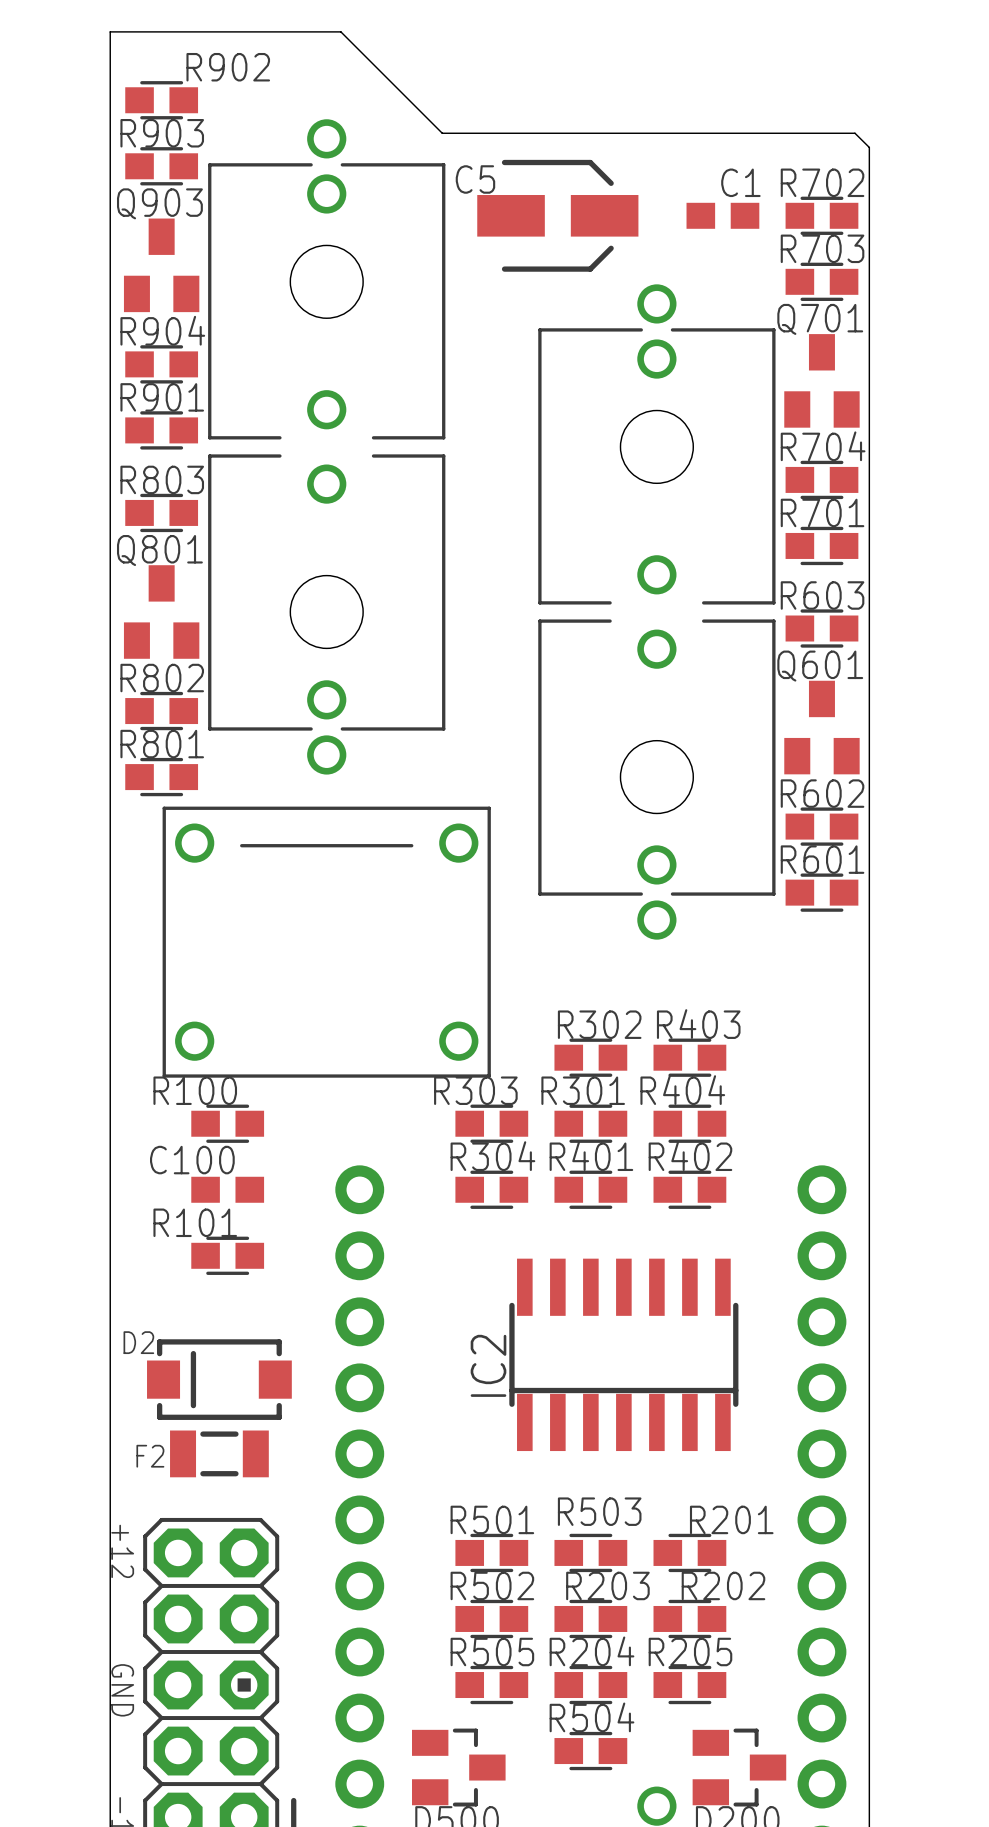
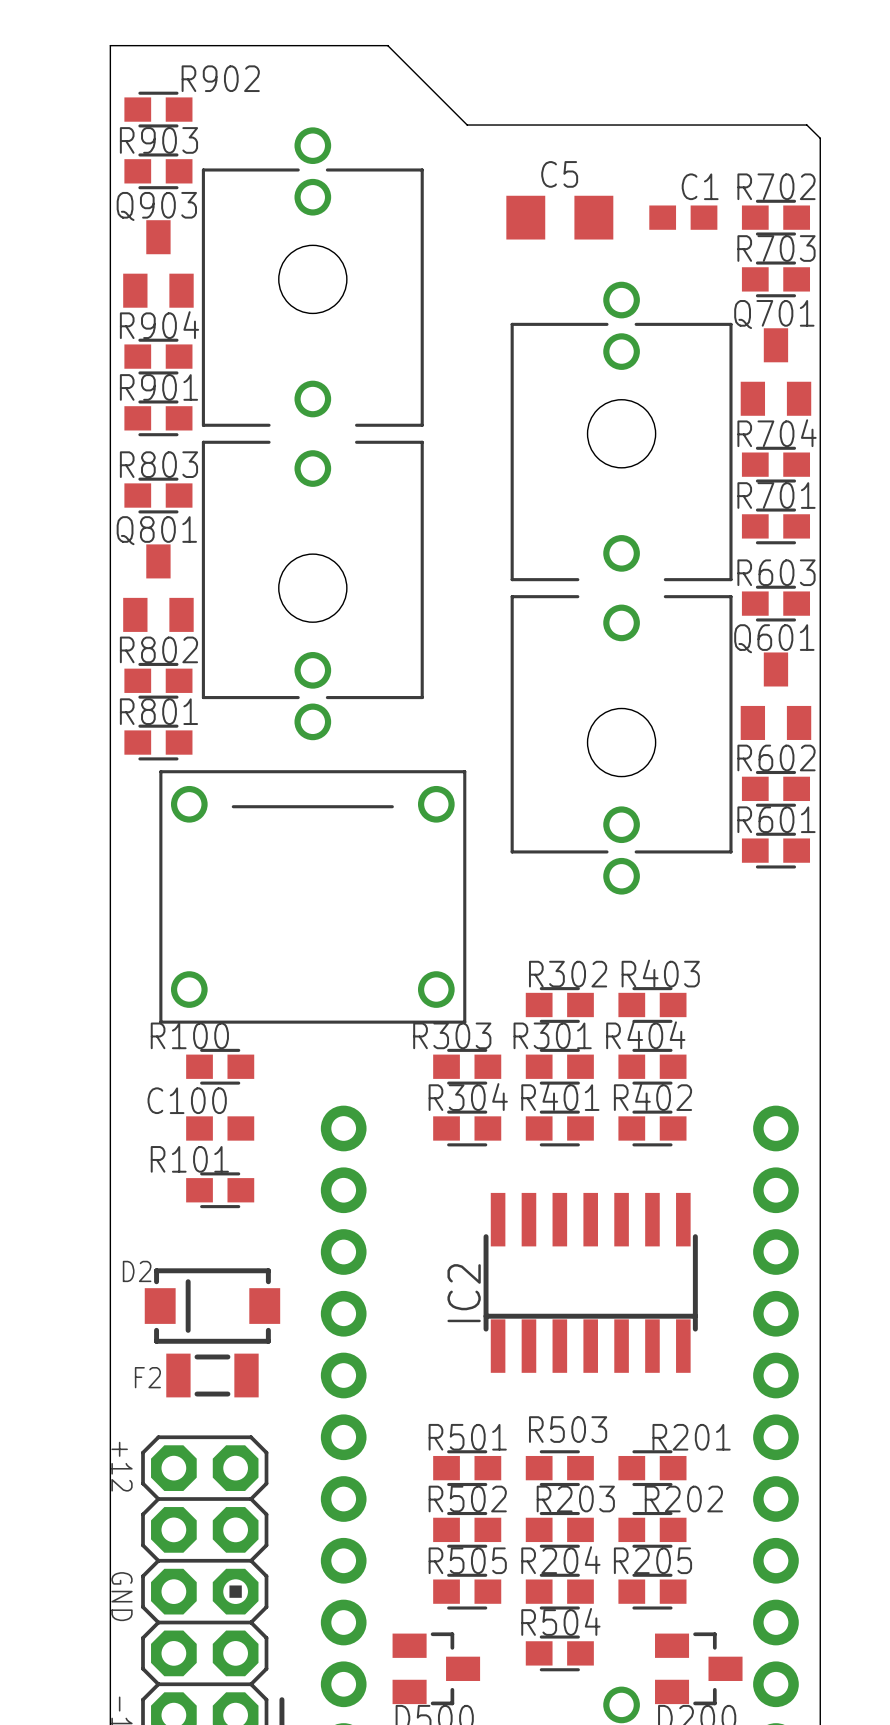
board edge: (340, 31) (442, 133) (854, 133) (869, 147) -> (326, 45) (387, 45) (467, 125) (806, 125) (820, 138) (820, 153)
C5 footprint: [477, 159, 639, 272] -> [506, 195, 614, 240]
C5 name position: C5 (475, 179) -> C5 (559, 174)

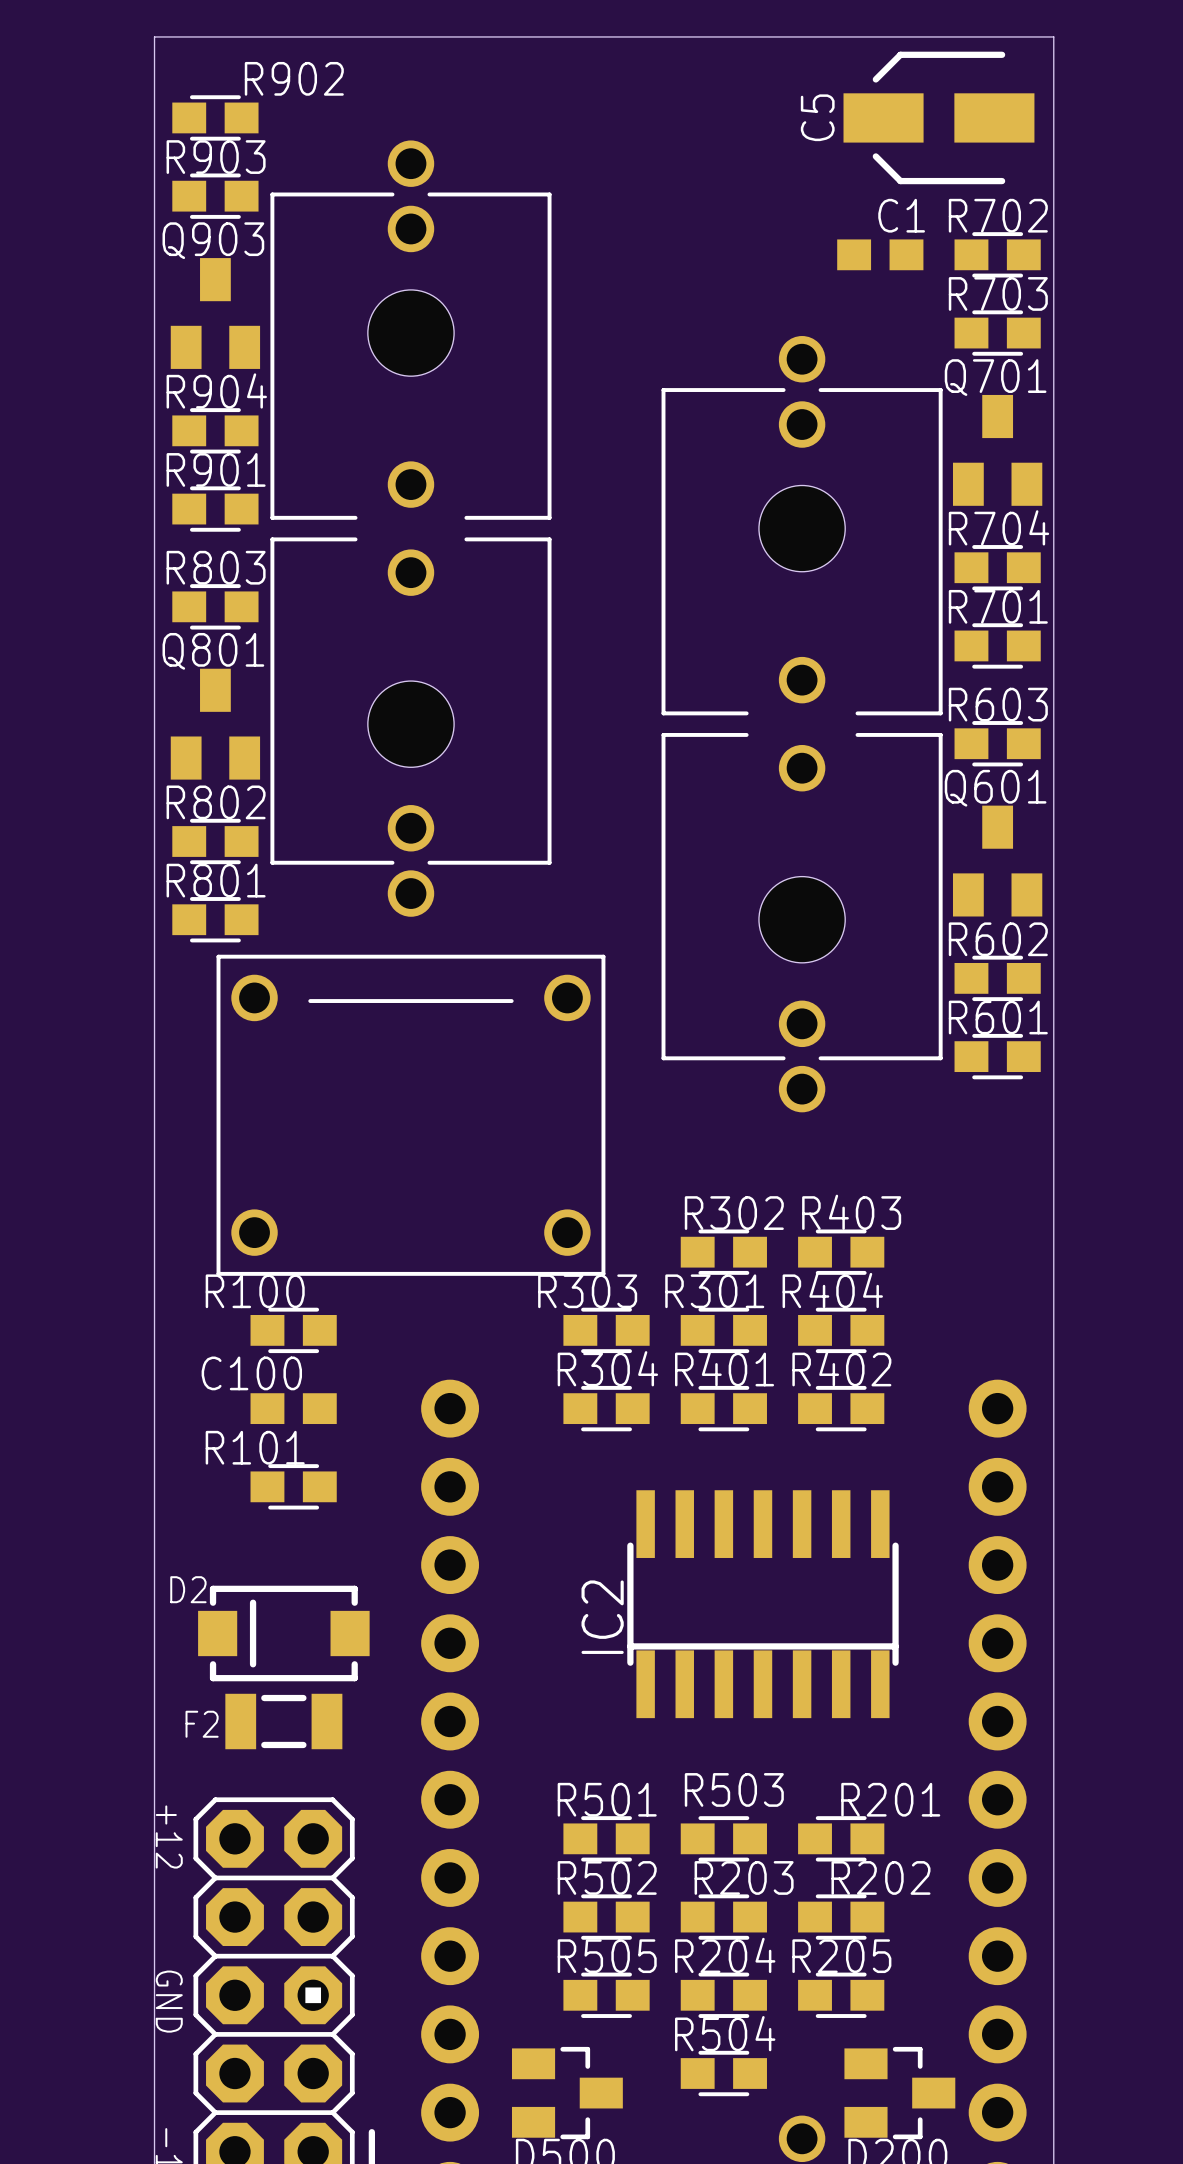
board edge: (387, 45) (467, 125) (806, 125) (820, 138) -> (506, 36) (1053, 36) (1053, 154)
C5 name position: C5 (559, 174) -> C5 (817, 117)
C5 footprint: [506, 195, 614, 240] -> [843, 51, 1035, 185]

